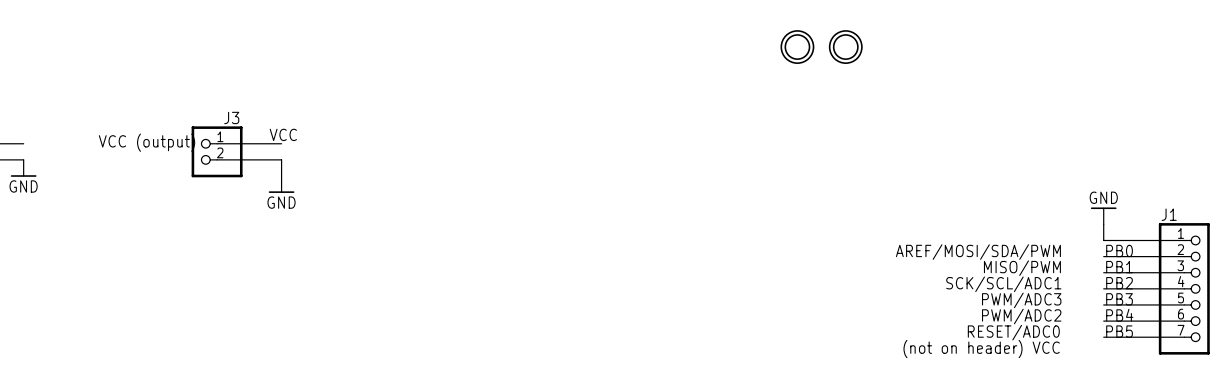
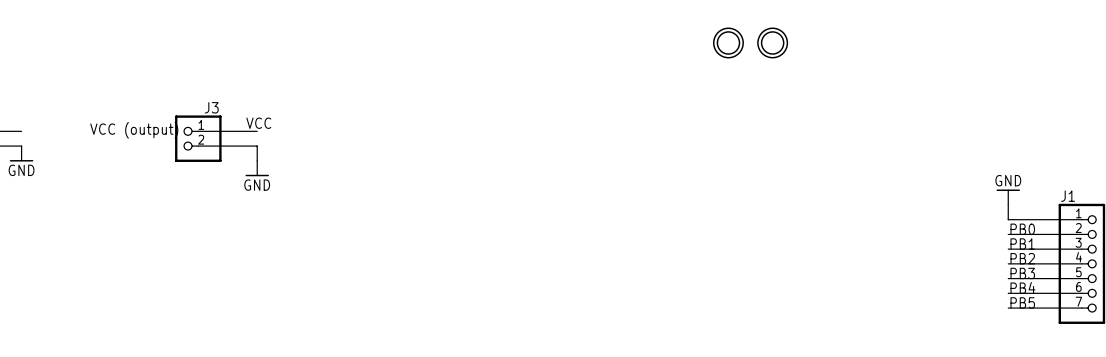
text: AREF/MOSI/SDA/PWM (978, 252) -> none
text: MISO/PWM (1022, 268) -> none
text: SCK/SCL/ADC1 (1003, 284) -> none
text: PWM/ADC3 (1021, 300) -> none
text: PWM/ADC2 (1021, 316) -> none
text: RESET/ADC0 (1013, 332) -> none
text: (not on header) VCC (981, 349) -> none

